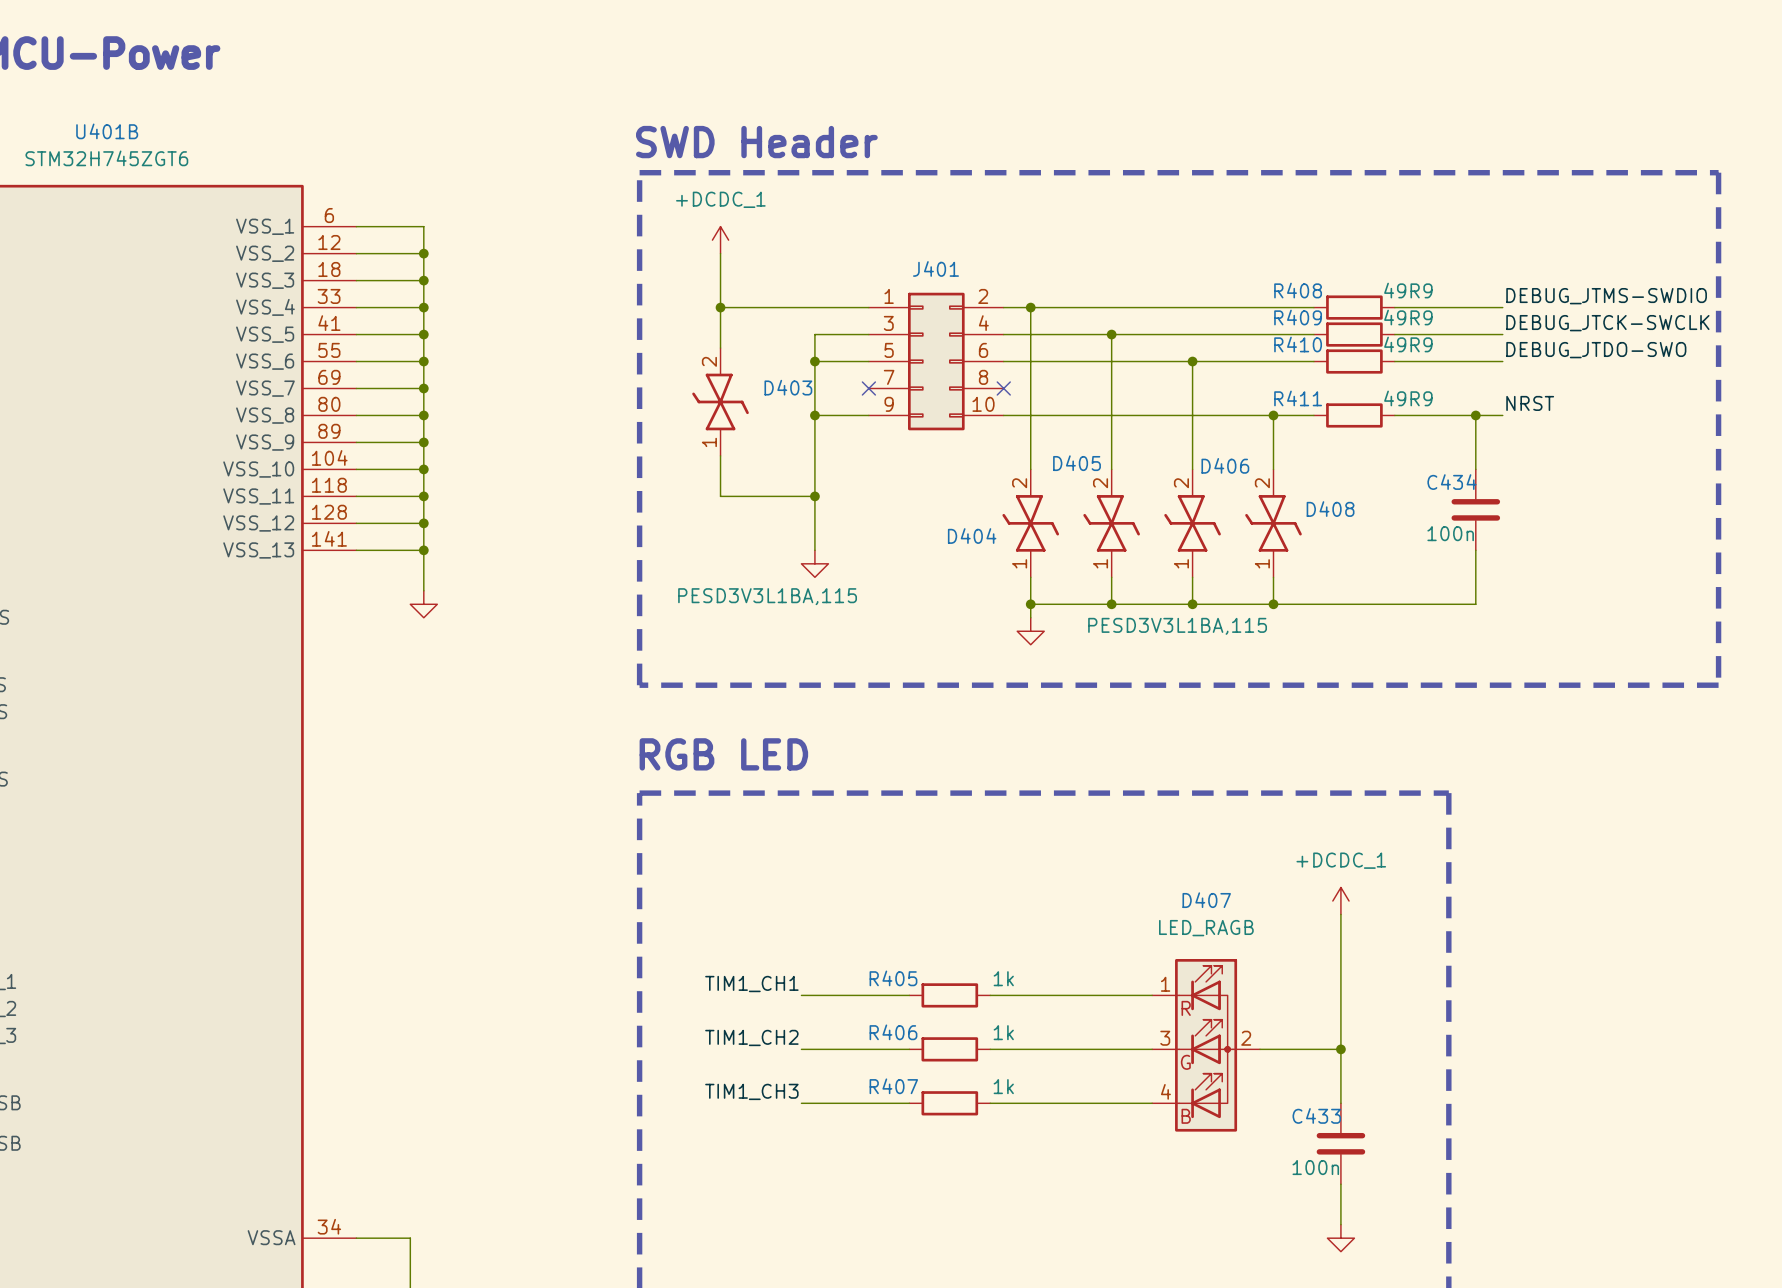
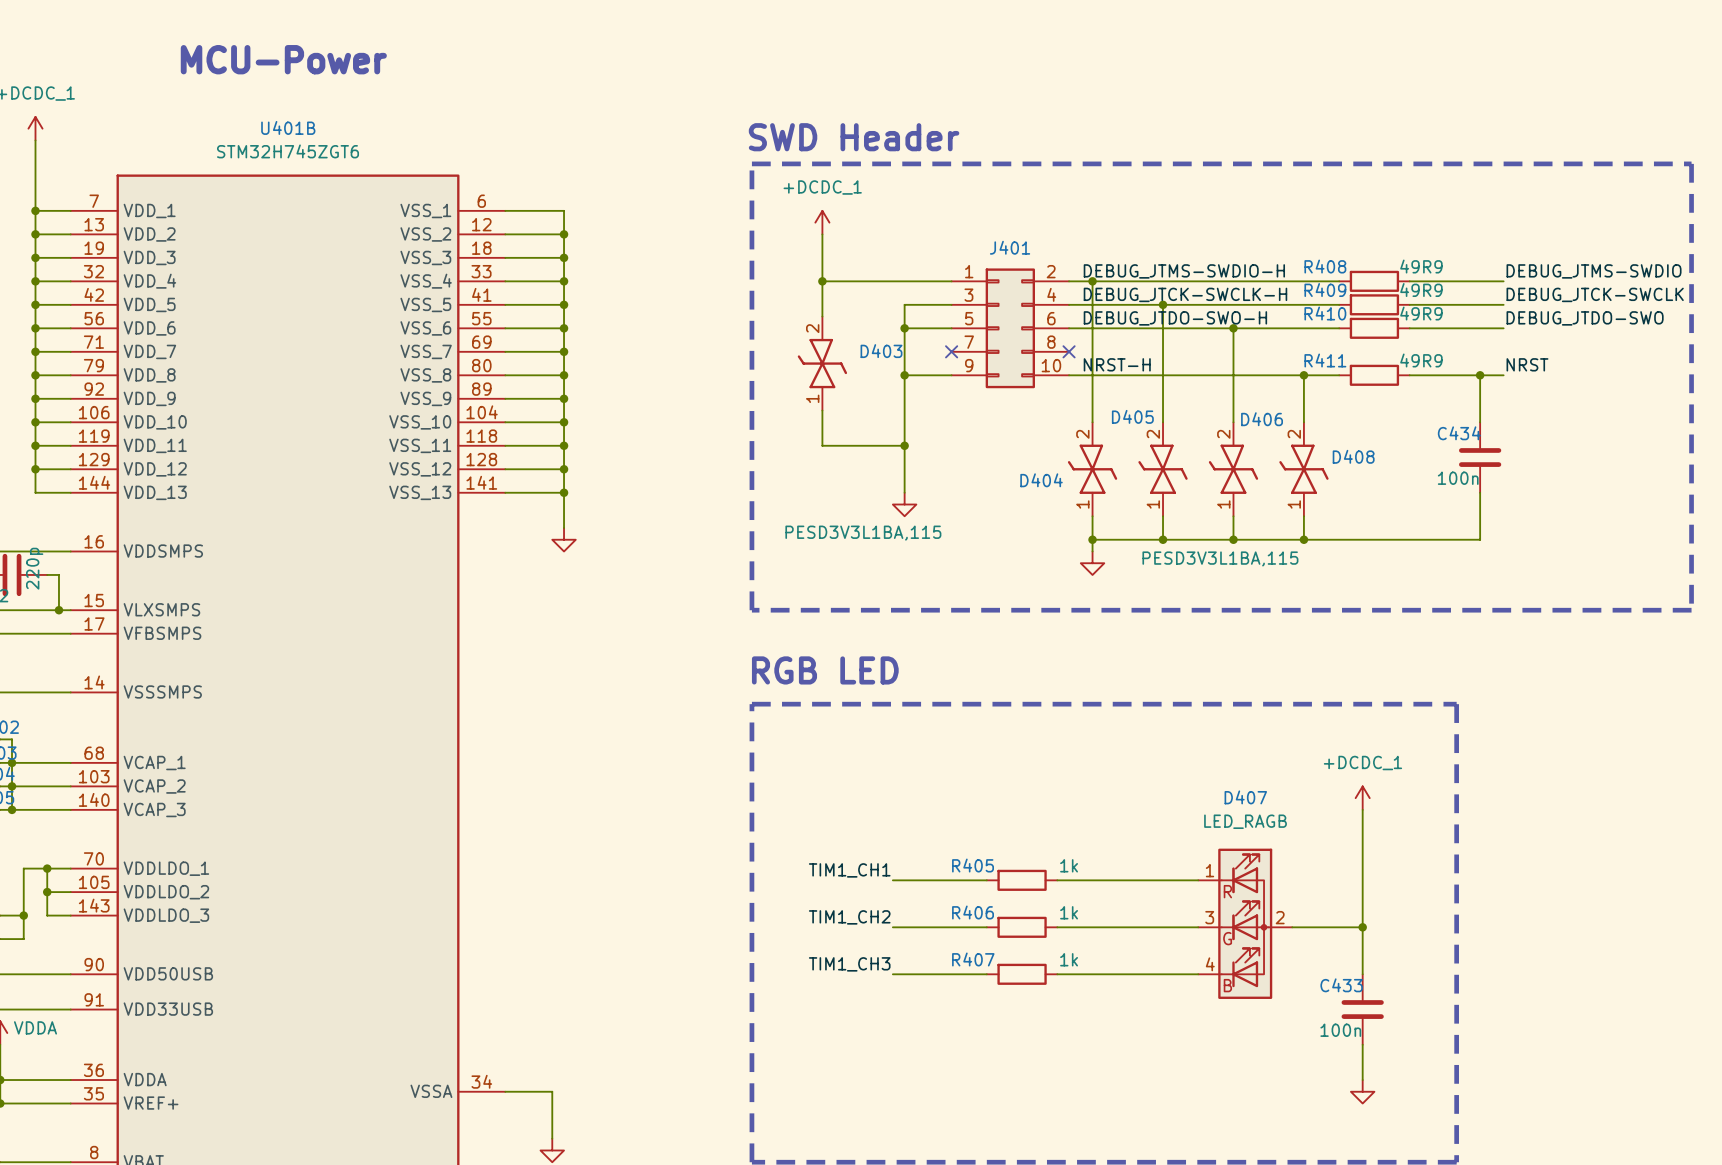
label: none -> DEBUG_JTMS-SWDIO-H (1184, 271)
label: none -> DEBUG_JTCK-SWCLK-H (1185, 294)
label: none -> DEBUG_JTDO-SWO-H (1175, 318)
label: none -> NRST-H (1117, 364)

